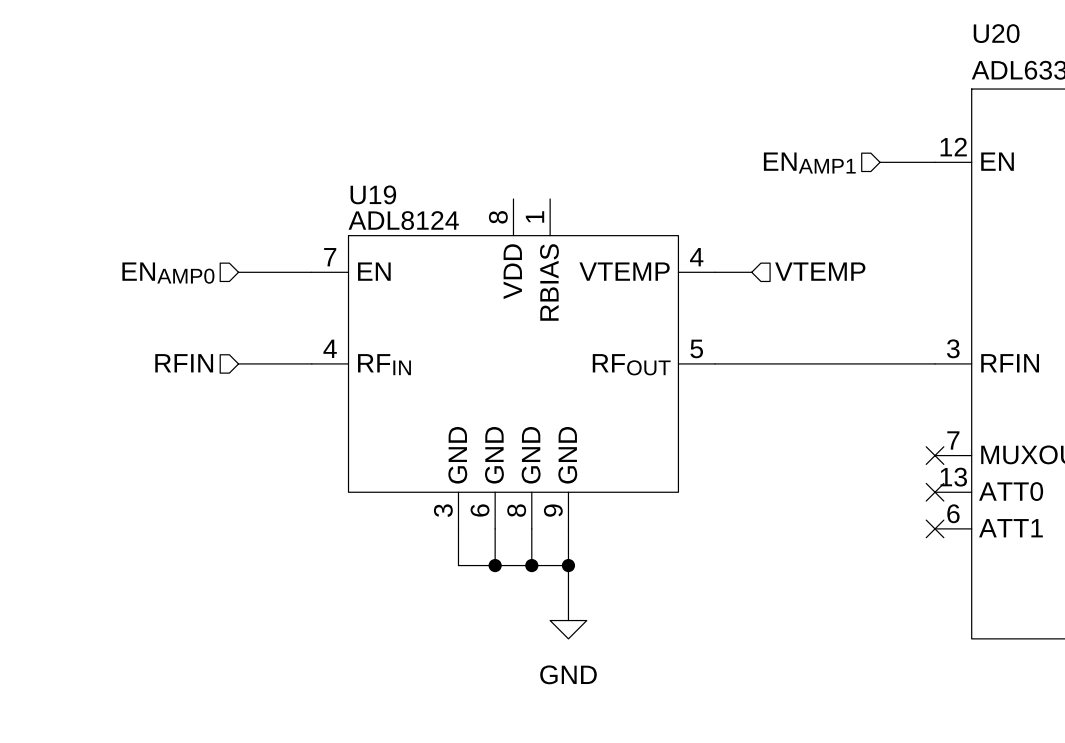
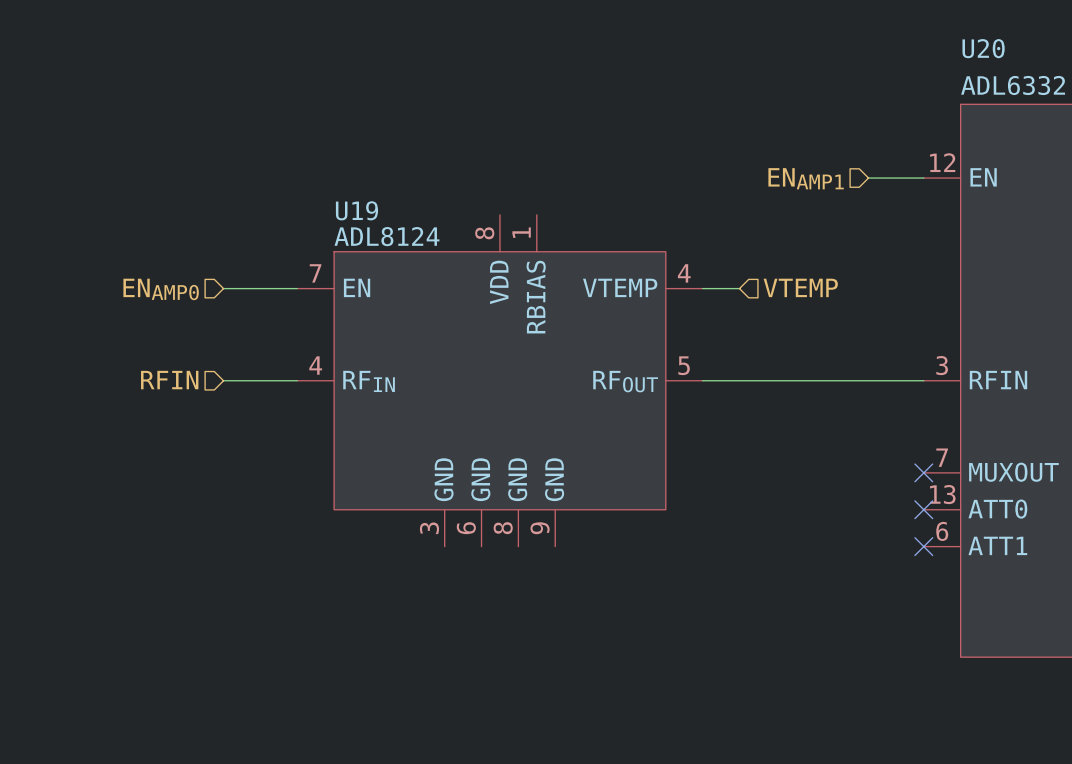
wire: (458, 528) (458, 565) (568, 565) -> none
wire: (495, 528) (495, 565) -> none
wire: (531, 528) (531, 565) -> none
wire: (568, 528) (568, 602) -> none
junction: (495, 565) -> none
junction: (531, 565) -> none
junction: (568, 565) -> none
power symbol: GND (568, 620) -> none

